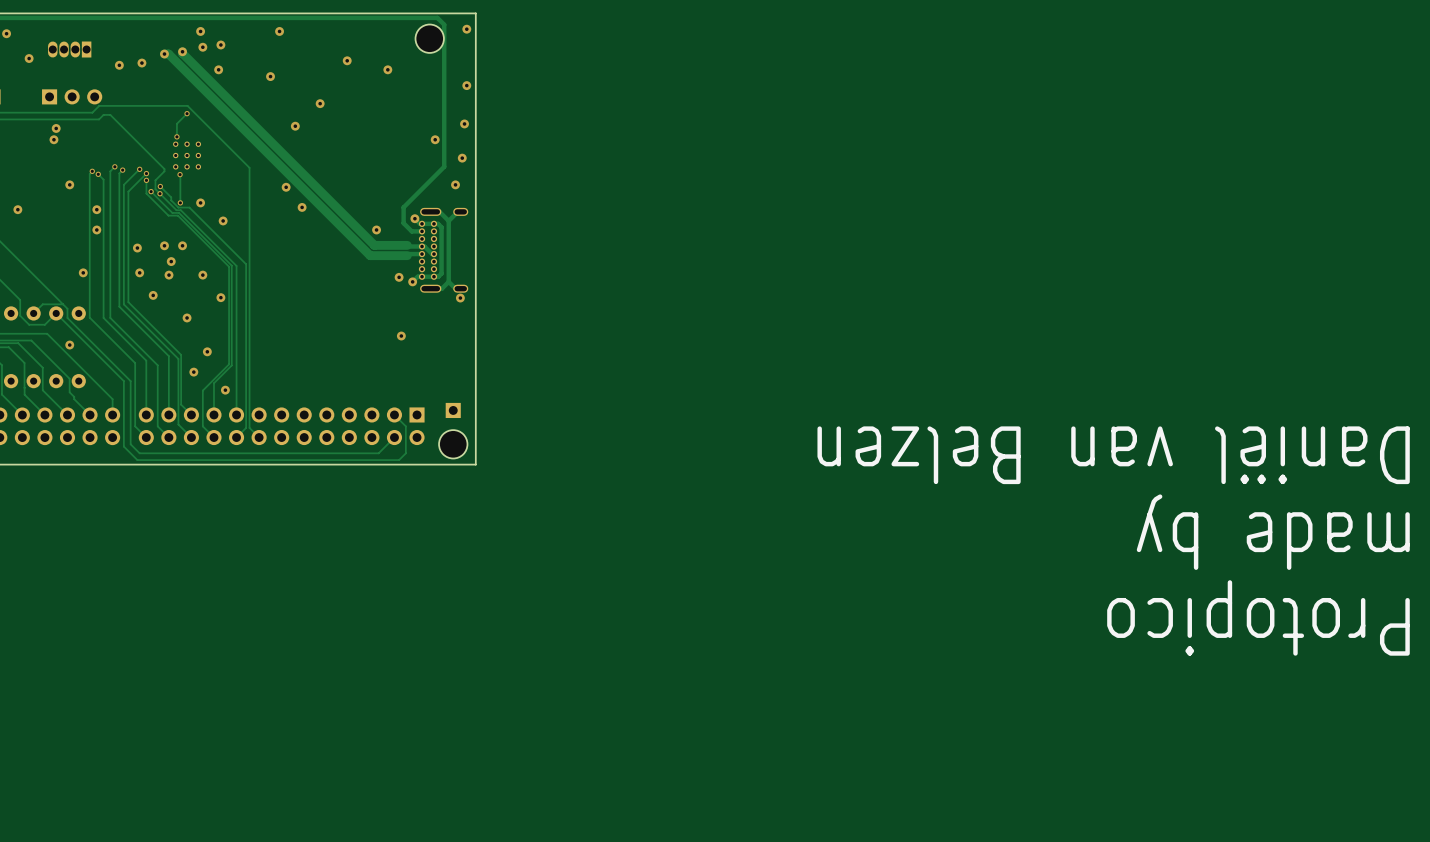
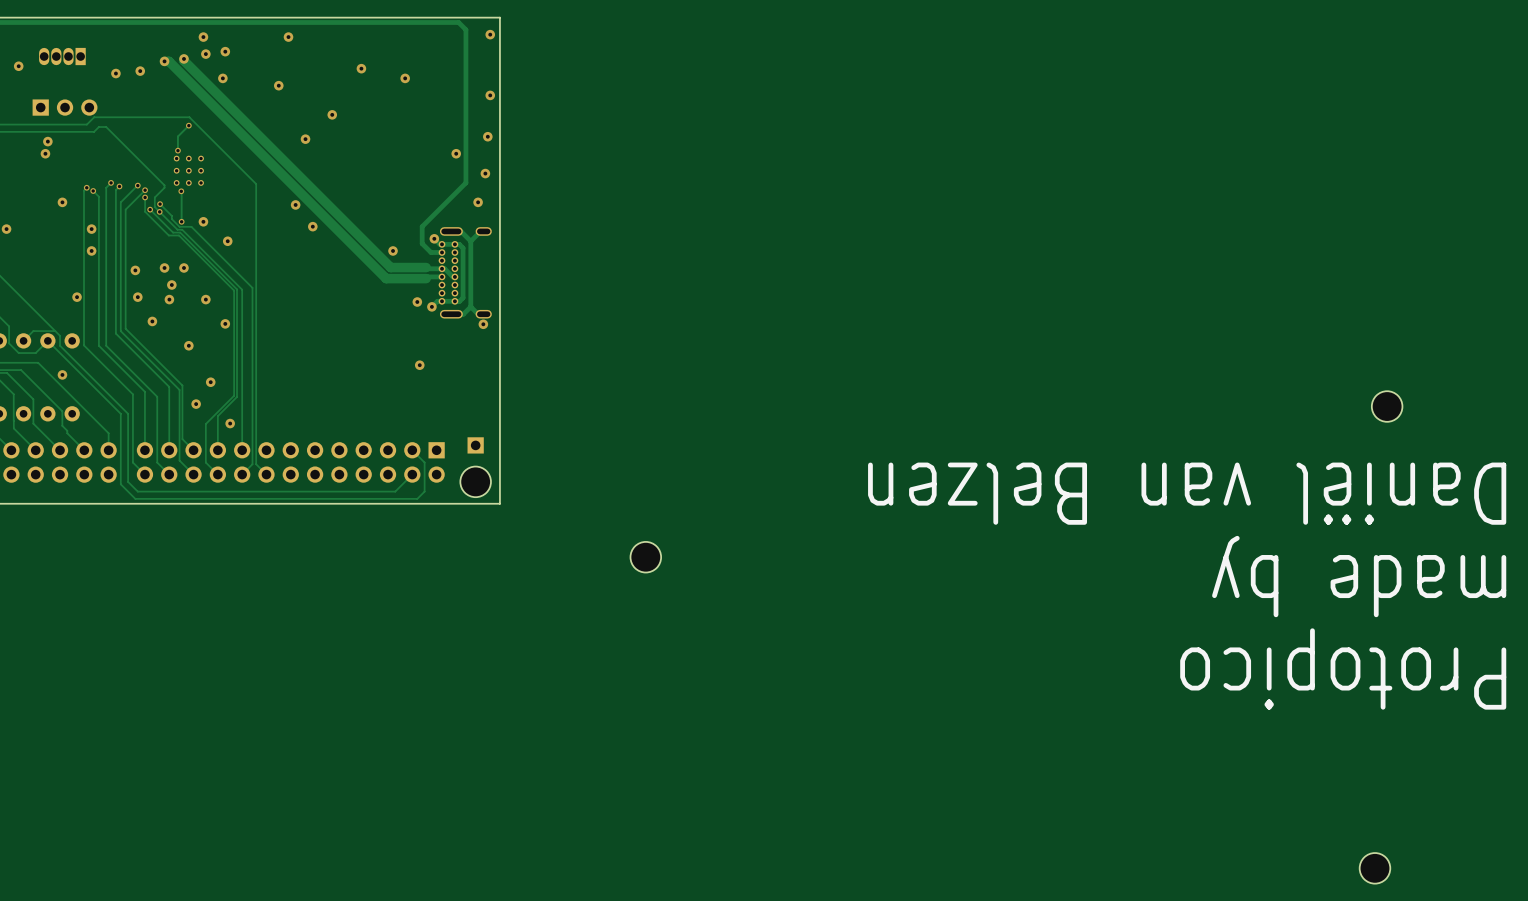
part: (429, 38) -> none
part: none -> (1387, 406)
part: none -> (645, 557)
part: none -> (1374, 868)

